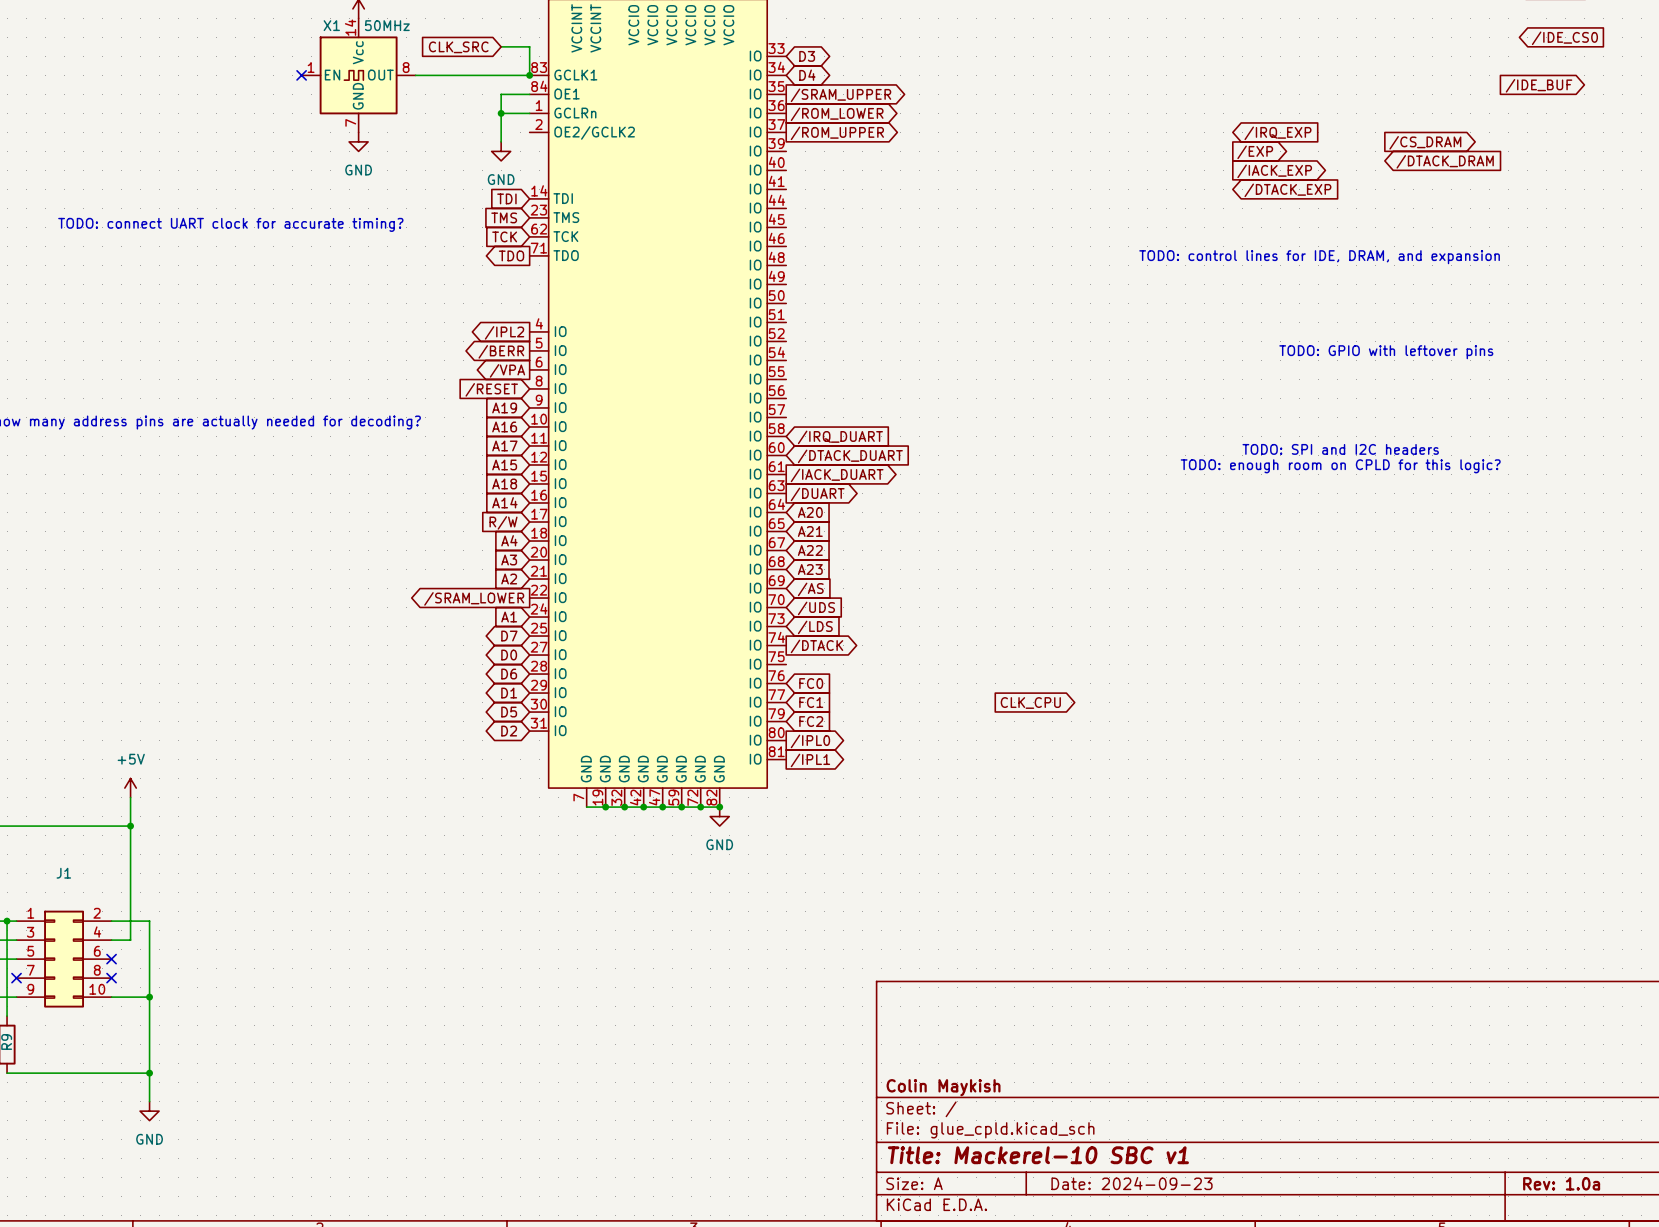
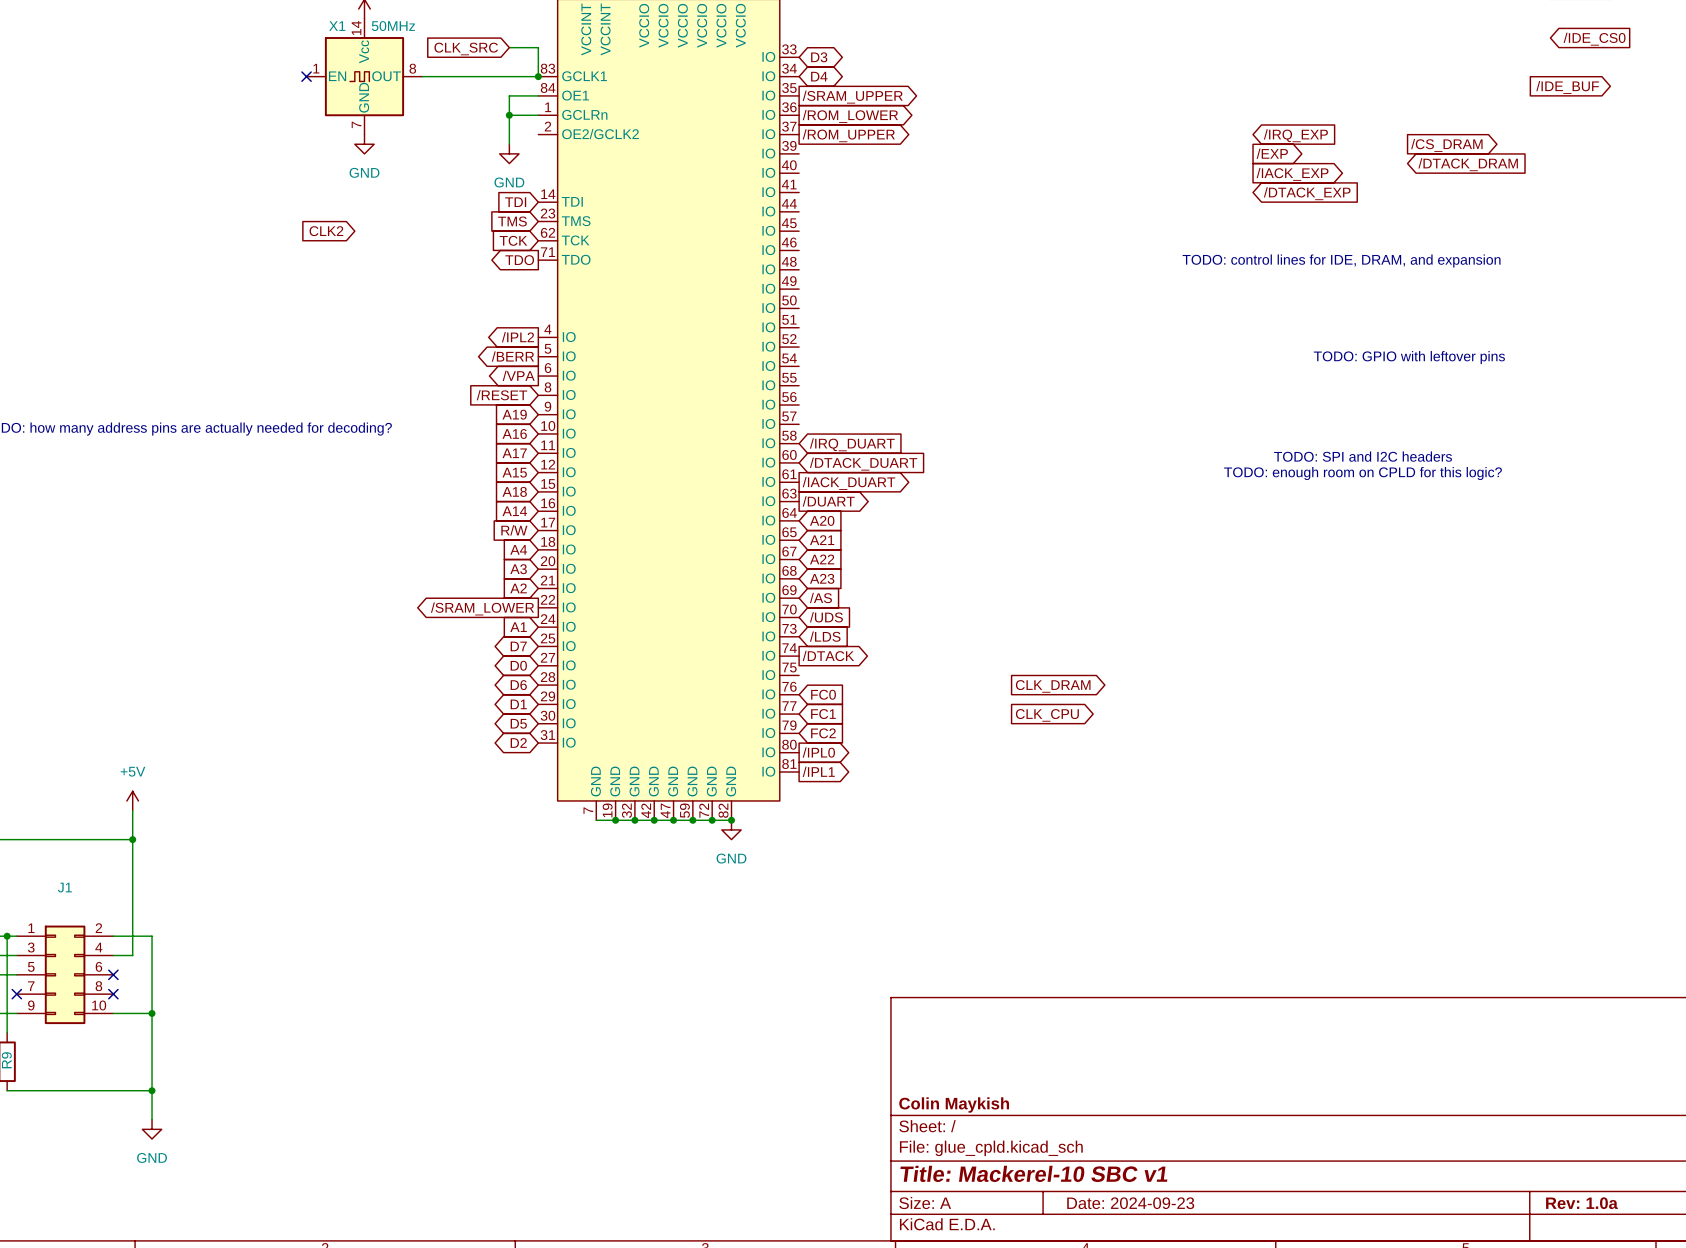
text: TODO: connect UART clock for accurate timing? (230, 224) -> none
global label: none -> CLK2 (326, 231)
global label: none -> CLK_DRAM (1053, 686)

